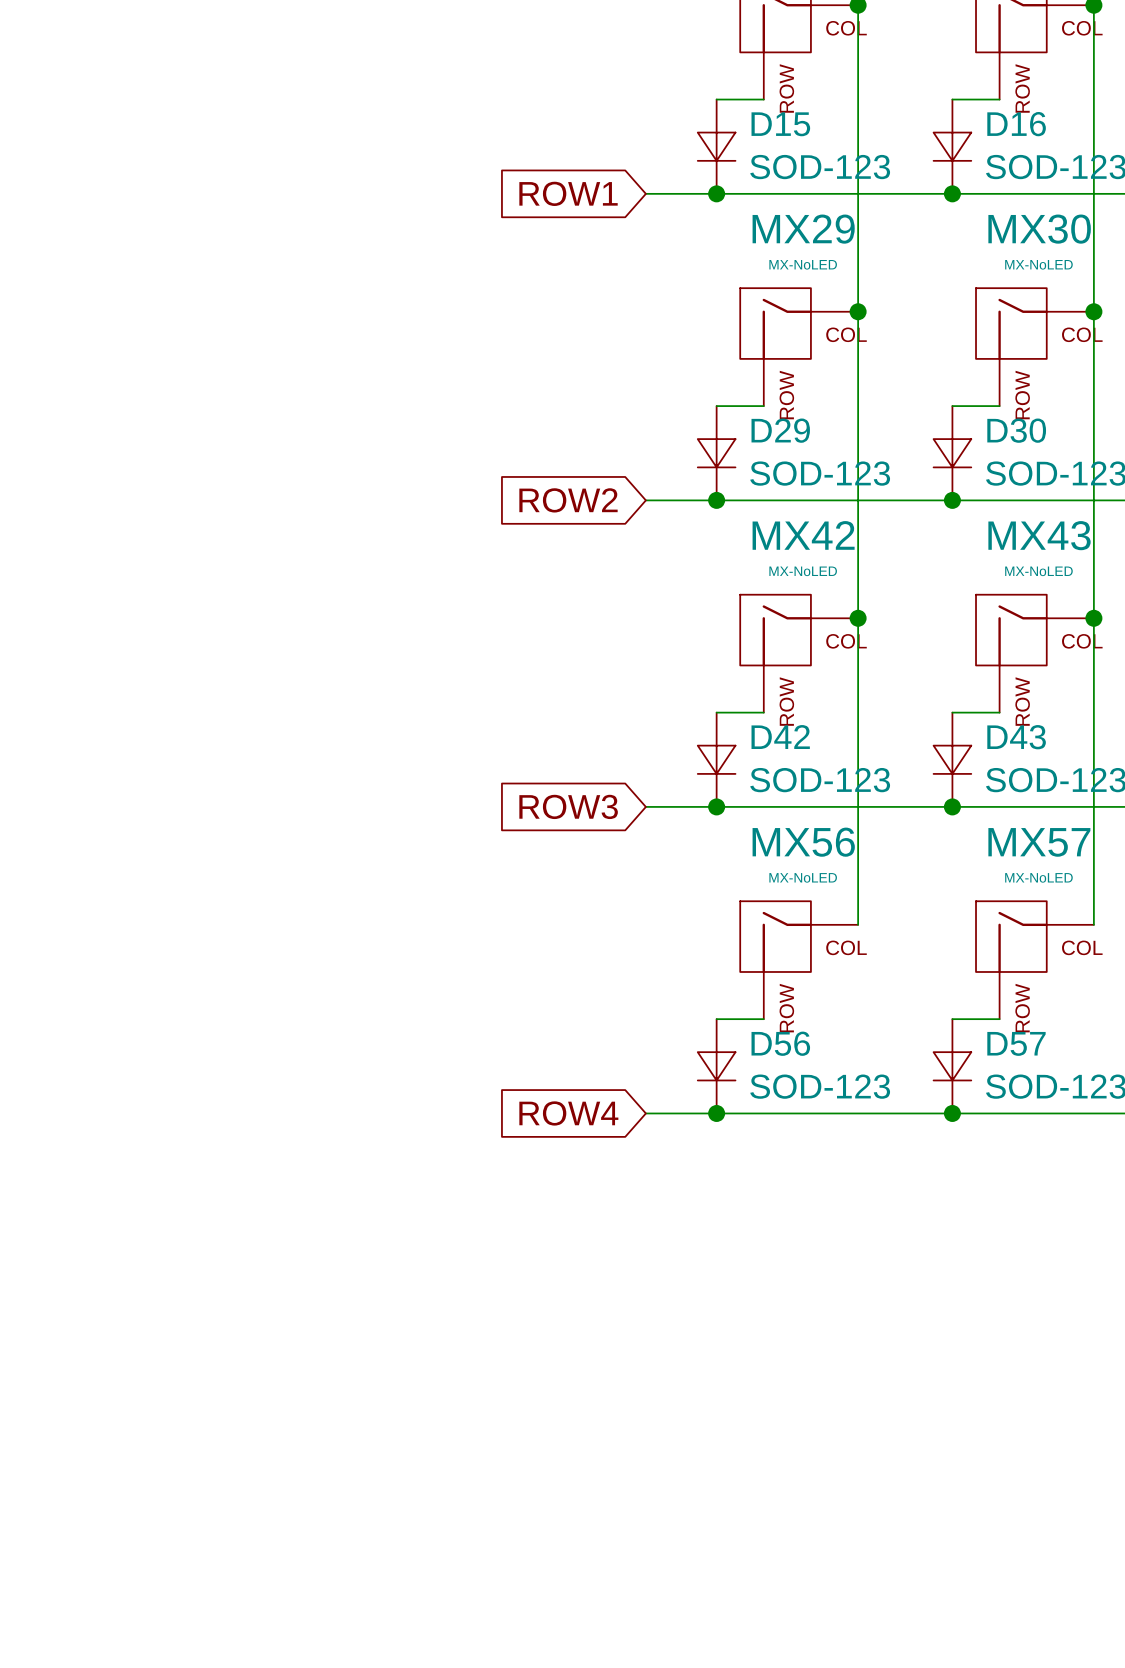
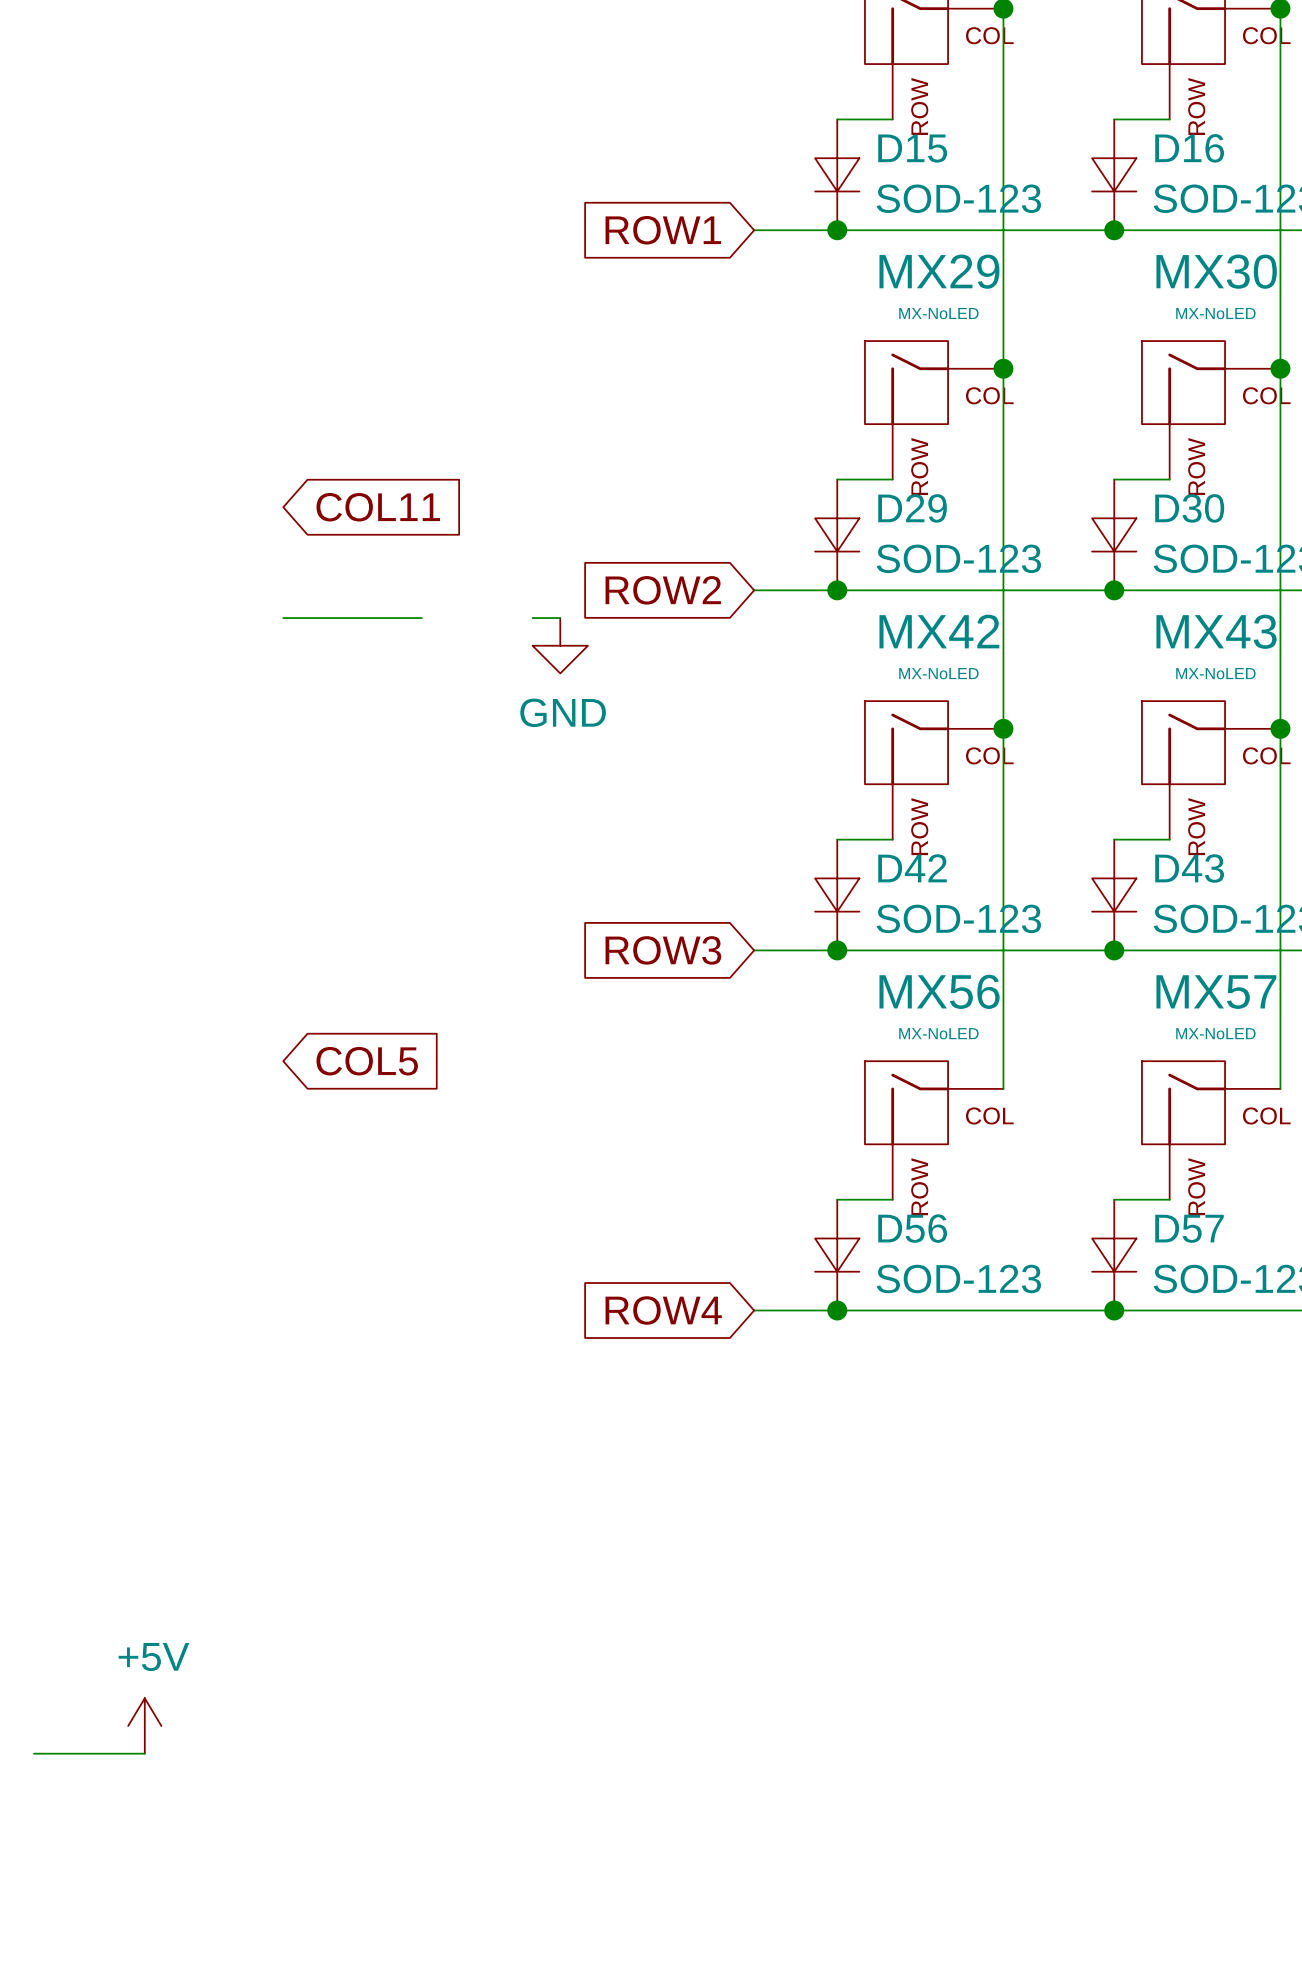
global label: none -> COL11 (378, 507)
wire: none -> (283, 618) (421, 618)
wire: none -> (532, 618) (560, 618)
power symbol: none -> GND (560, 645)
global label: none -> COL5 (367, 1061)
power symbol: none -> +5V (144, 1725)
wire: none -> (34, 1753) (144, 1753)

